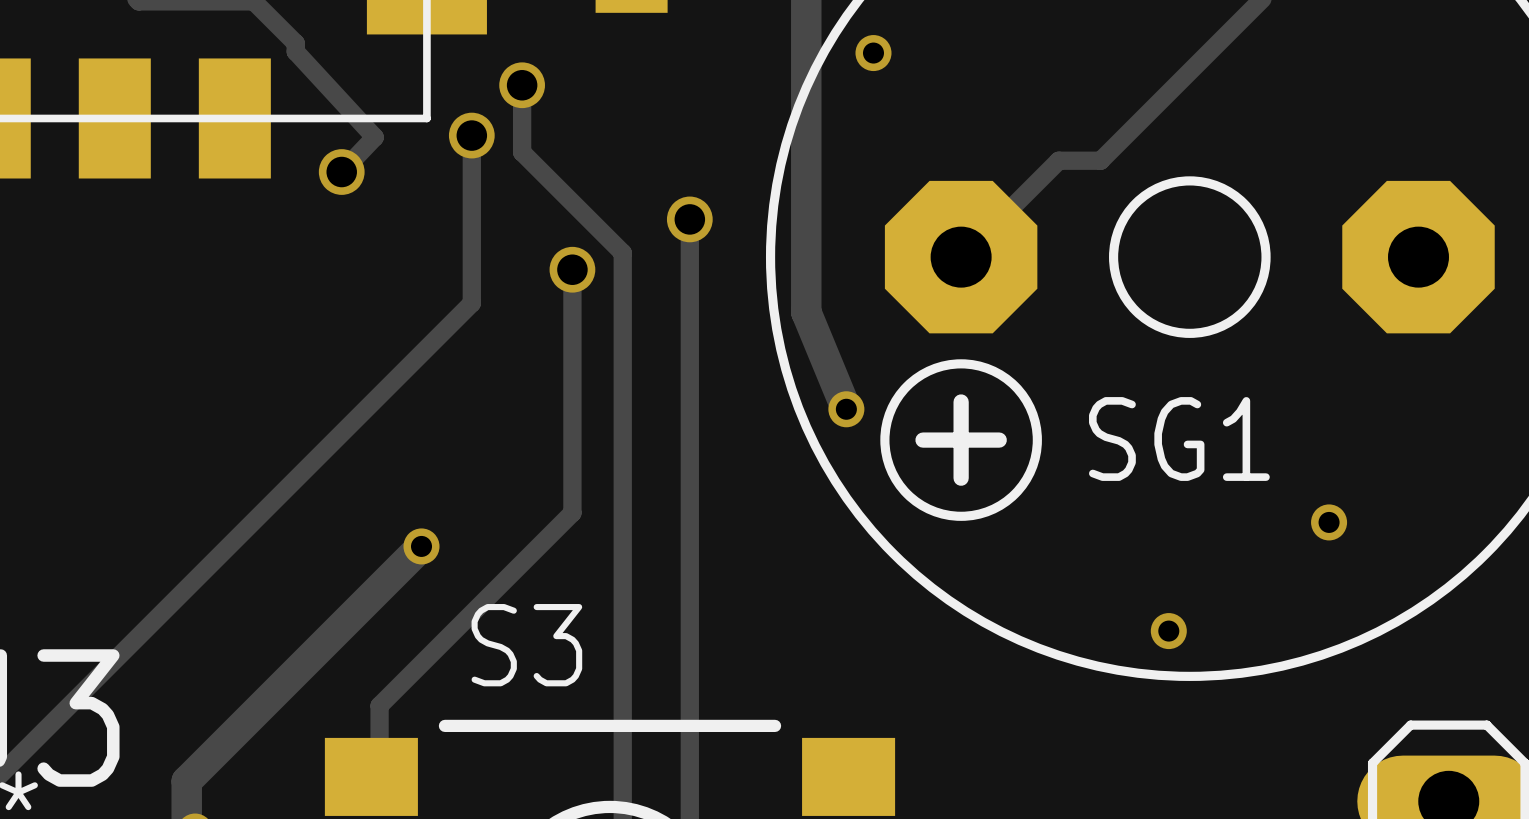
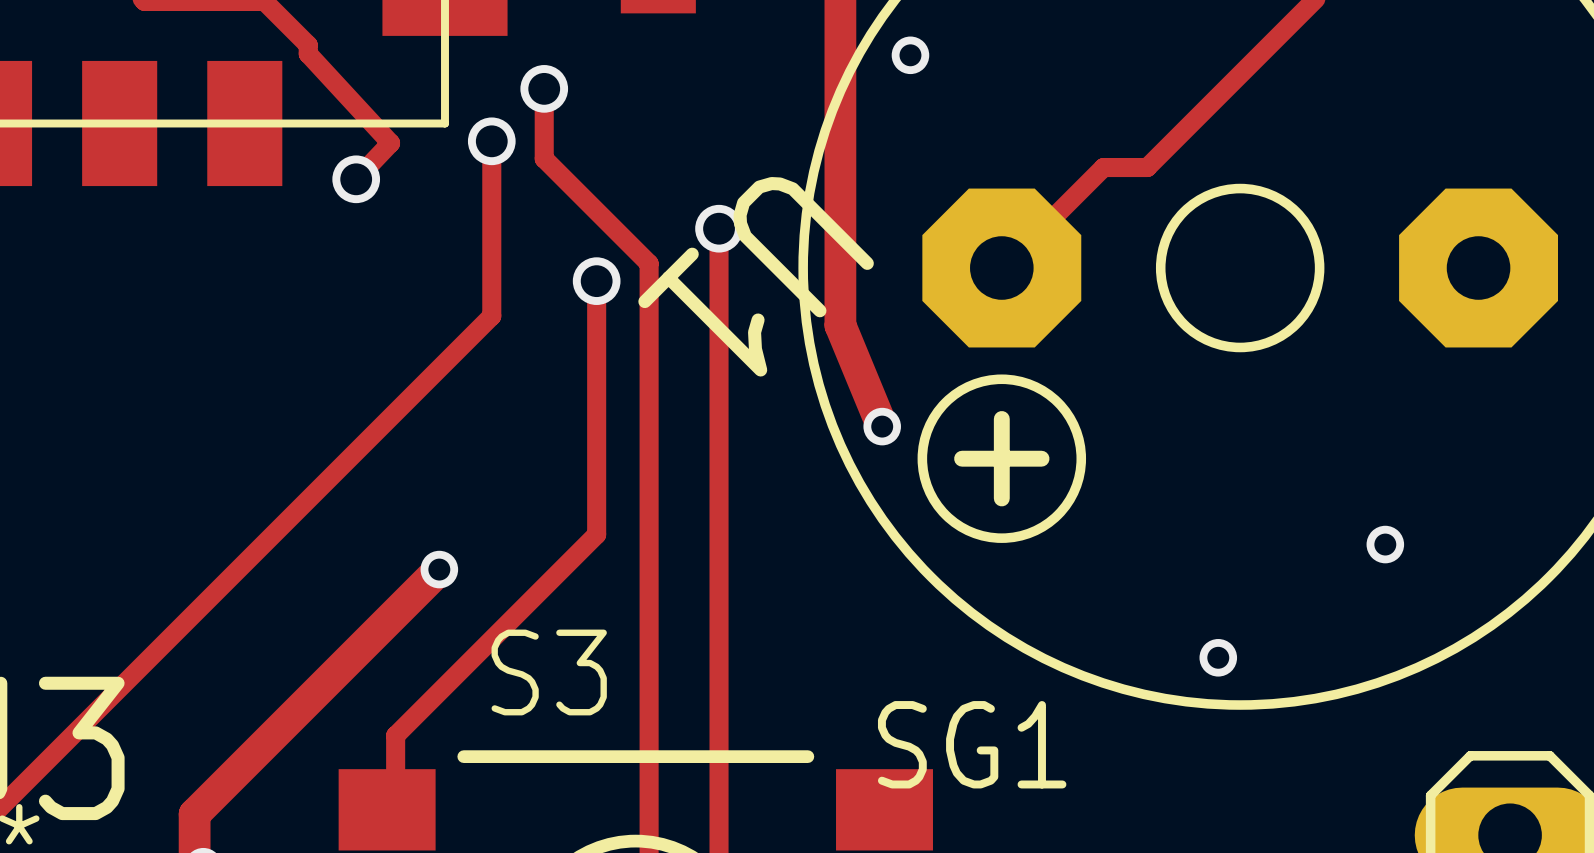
U1: none -> (756, 276)
SG1 name position: SG1 (1179, 439) -> SG1 (972, 744)

